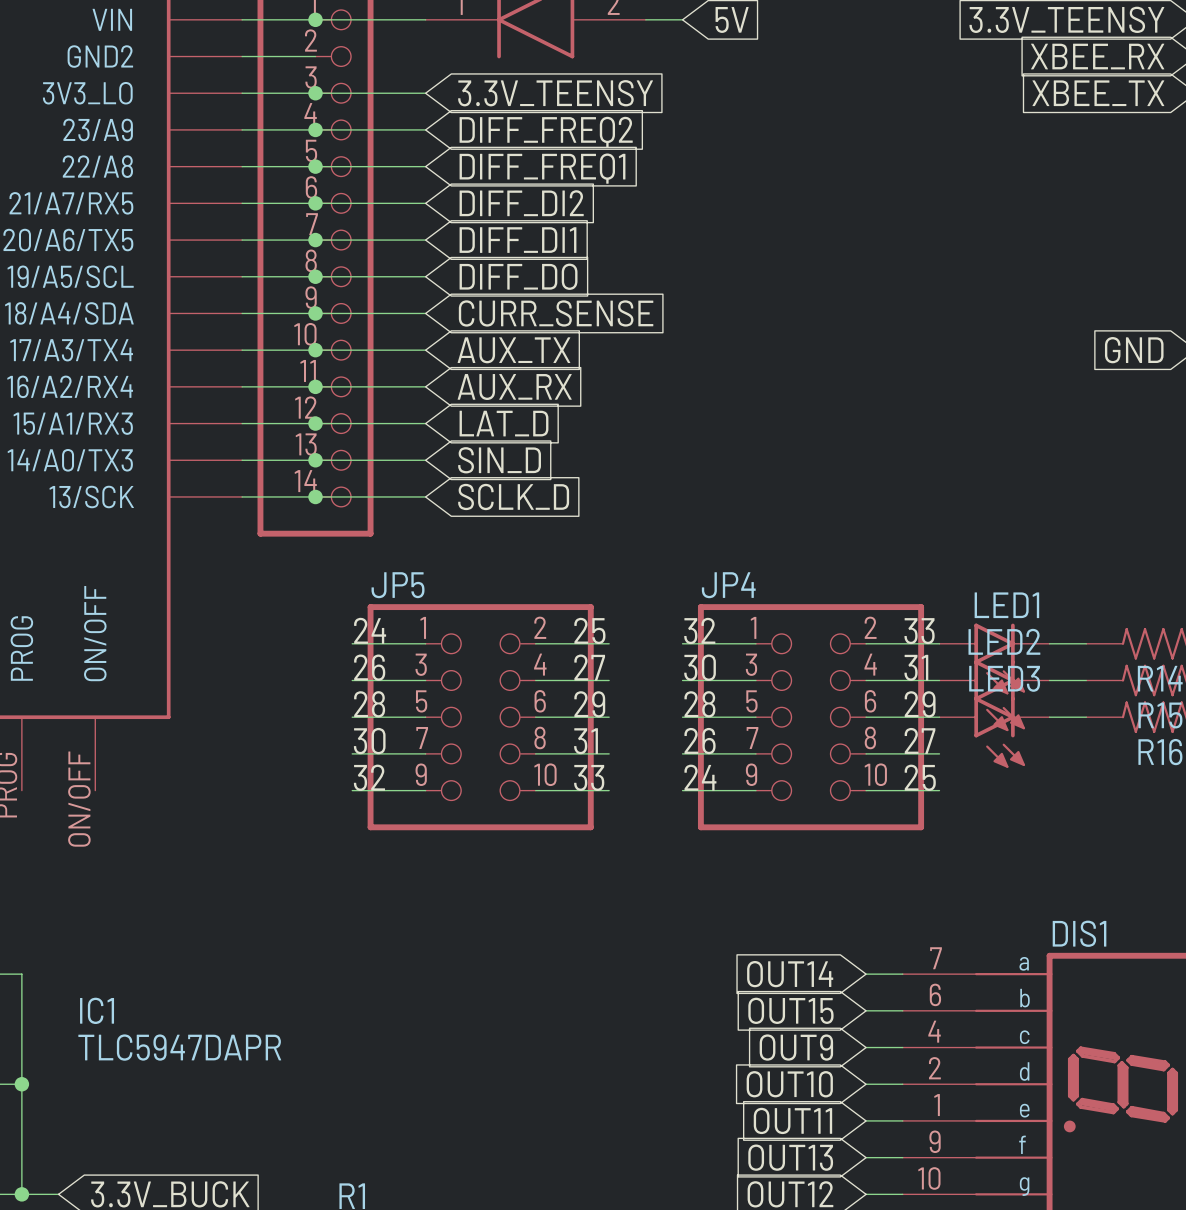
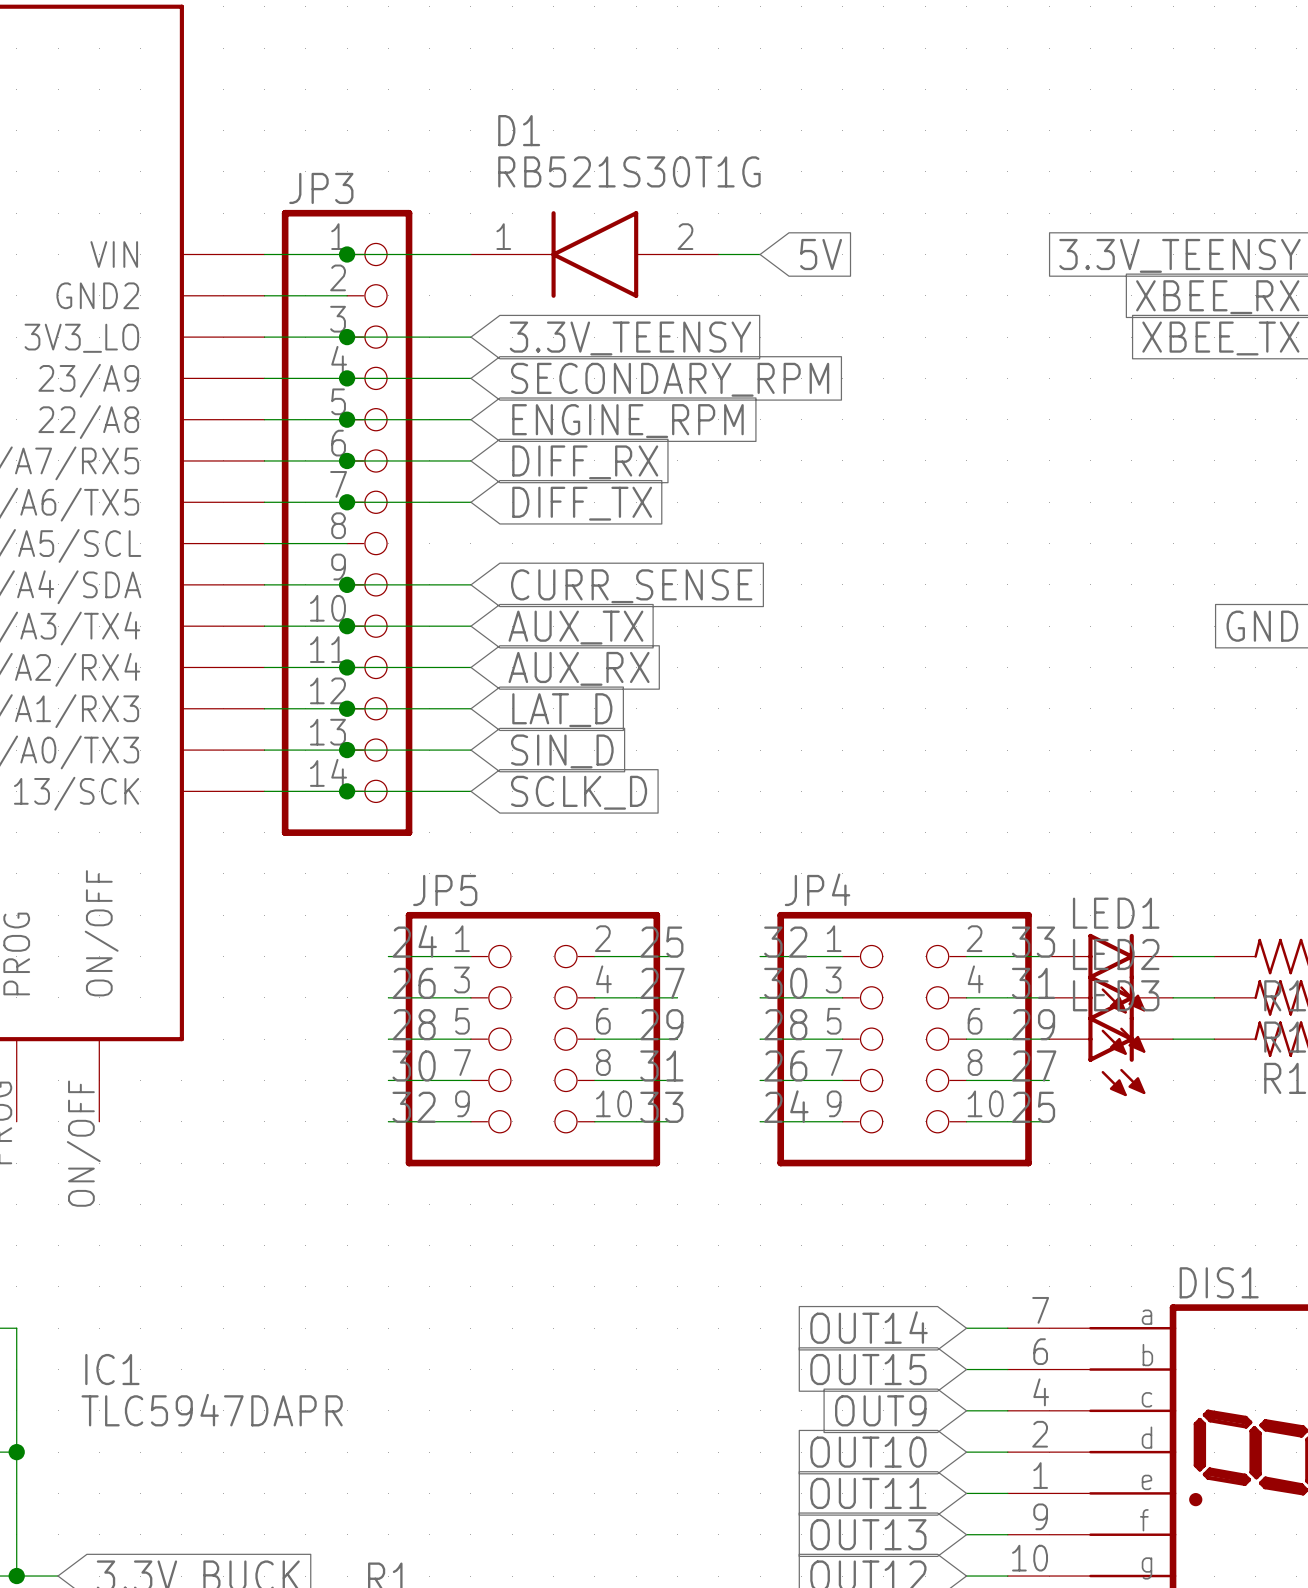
global label: DIFF_FREQ2 (546, 131) -> SECONDARY_RPM (670, 379)
global label: DIFF_FREQ1 (542, 168) -> ENGINE_RPM (627, 421)
global label: DIFF_DI2 (521, 203) -> DIFF_RX (585, 462)
global label: DIFF_DI1 (517, 240) -> DIFF_TX (582, 503)
wire: (315, 276) (425, 276) -> none
junction: (315, 276) -> none
global label: DIFF_DO (518, 276) -> none

